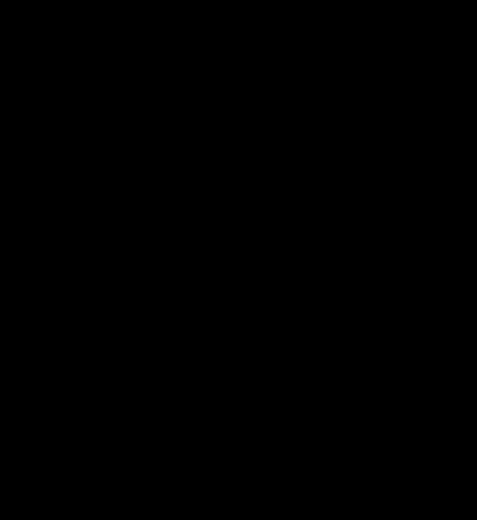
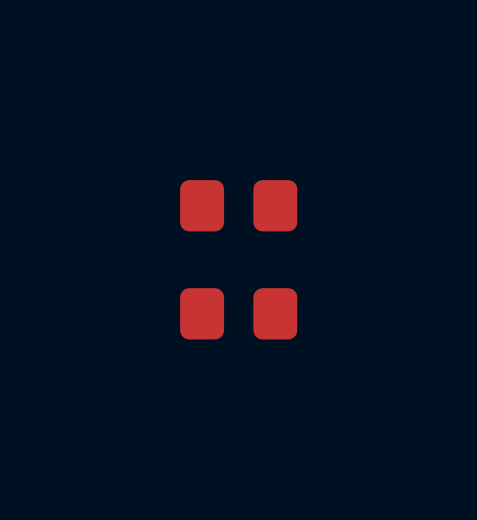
part: none -> (238, 205)
part: none -> (238, 313)

